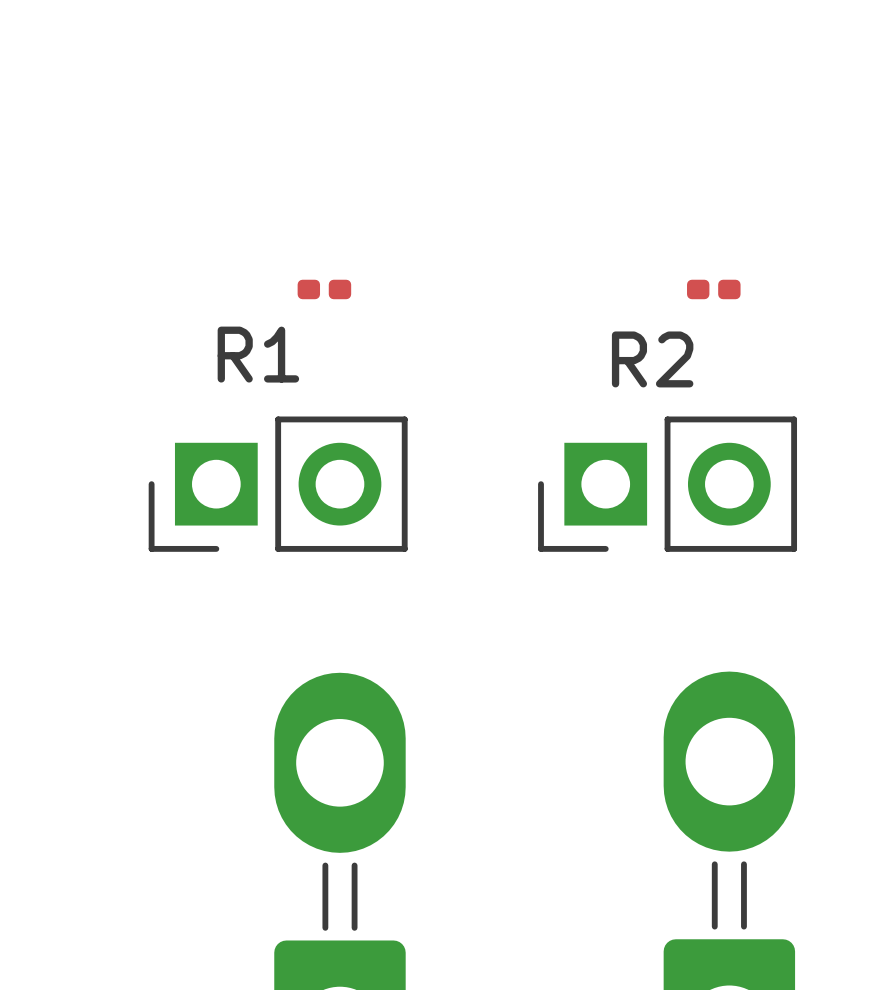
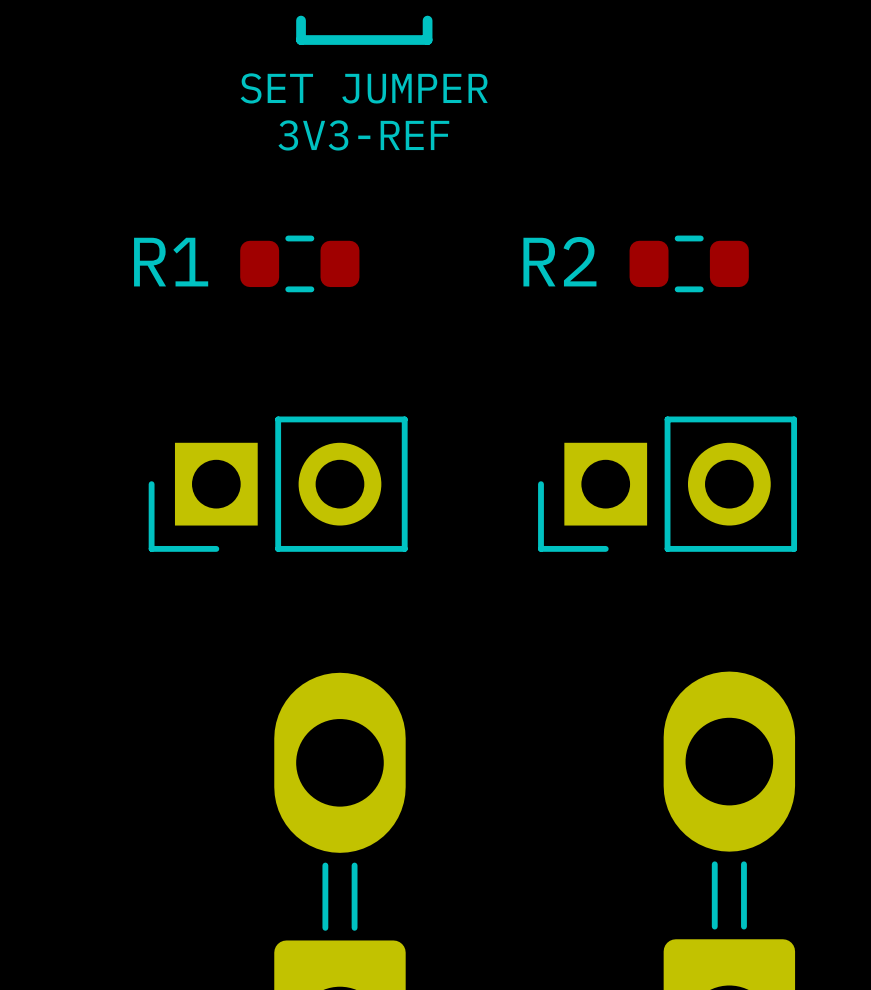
line: none -> (301, 20) (301, 40) (427, 40) (427, 20)
text: none -> SET JUMPER (364, 88)
text: none -> 3V3-REF (363, 135)
R1 footprint: [297, 279, 352, 300] -> [240, 235, 360, 293]
R2 footprint: [687, 279, 741, 300] -> [629, 235, 749, 293]
R2 name position: R2 (652, 359) -> R2 (559, 261)

